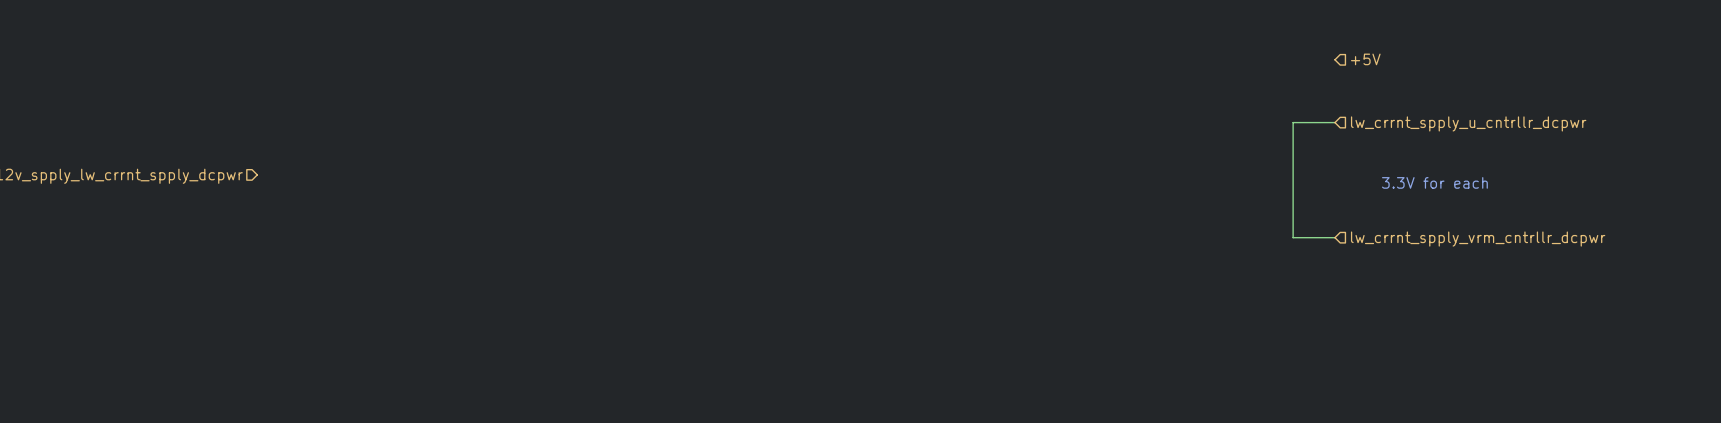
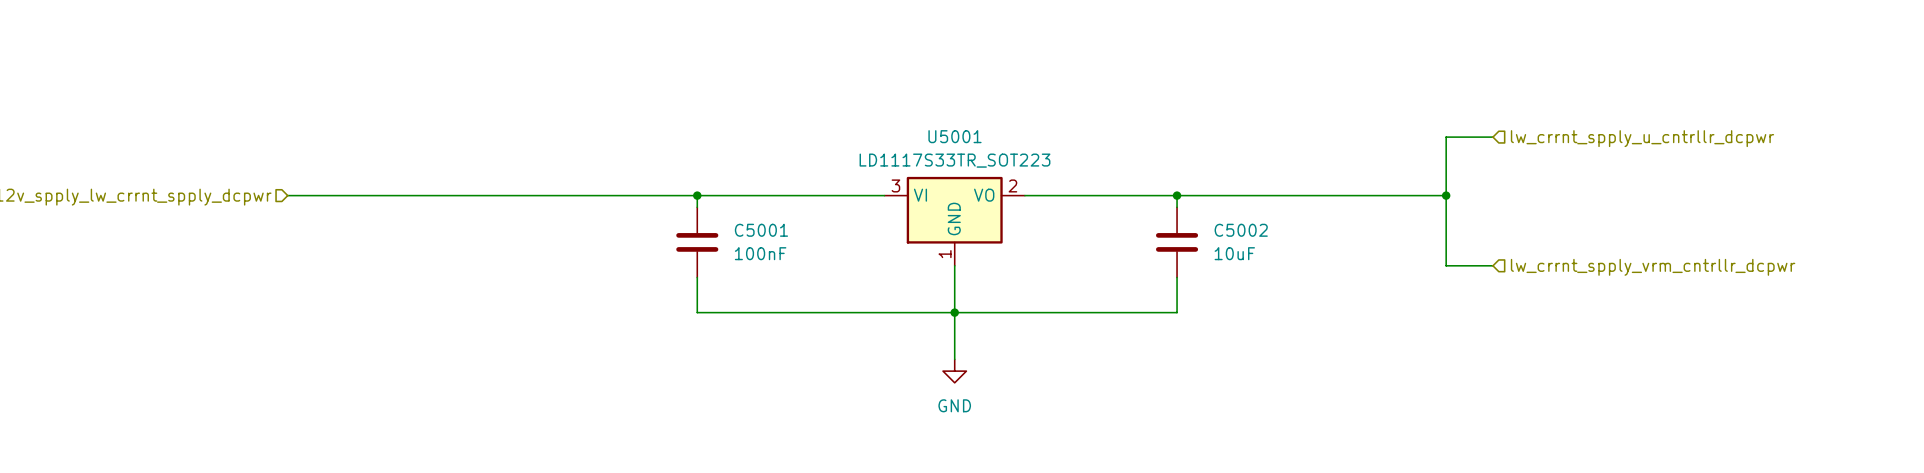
hierarchical label: +5V (1365, 59) -> none
wire: none -> (287, 195) (884, 195)
wire: none -> (697, 195) (697, 207)
junction: none -> (697, 195)
wire: none -> (1024, 195) (1446, 195)
wire: none -> (1177, 195) (1177, 207)
junction: none -> (1177, 195)
junction: none -> (1446, 195)
text: 3.3V for each (1434, 182) -> none
U5001: none -> LD1117S33TR_SOT223 (954, 221)
C5001: none -> 100nF (697, 242)
C5002: none -> 10uF (1177, 242)
wire: none -> (954, 265) (954, 359)
wire: none -> (697, 277) (697, 312) (1177, 312) (1177, 277)
junction: none -> (954, 312)
power symbol: none -> GND (954, 371)

